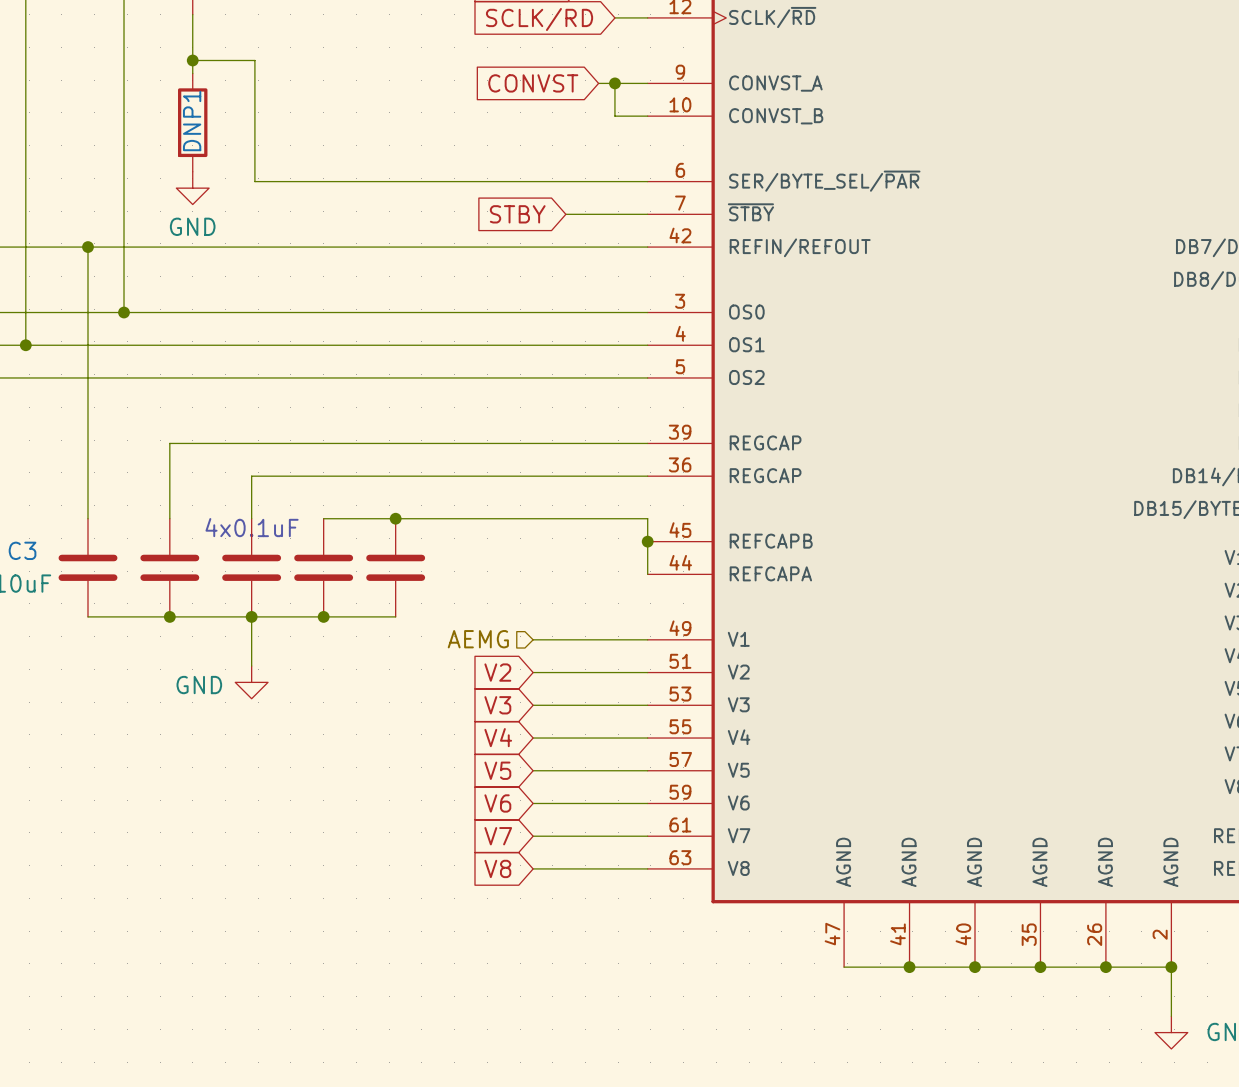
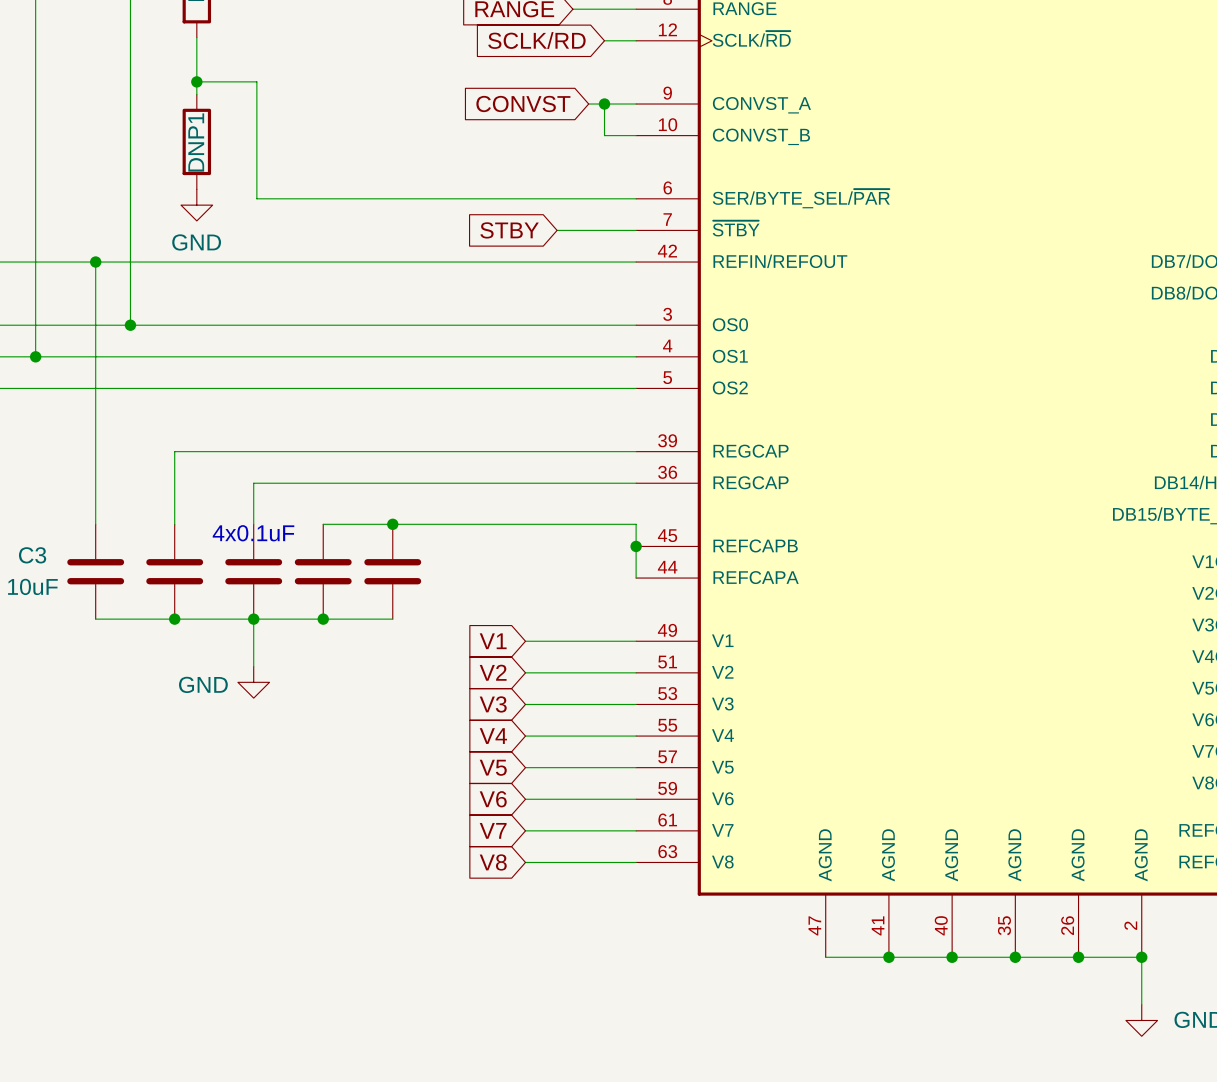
hierarchical label: AEMG (478, 639) -> none
global label: none -> V1 (493, 641)

